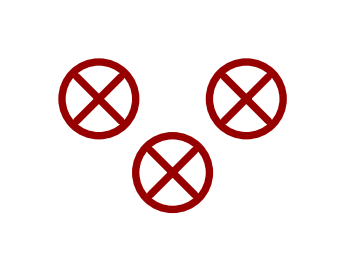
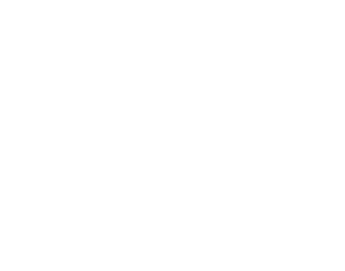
part: (98, 98) -> none
part: (246, 98) -> none
part: (172, 172) -> none

